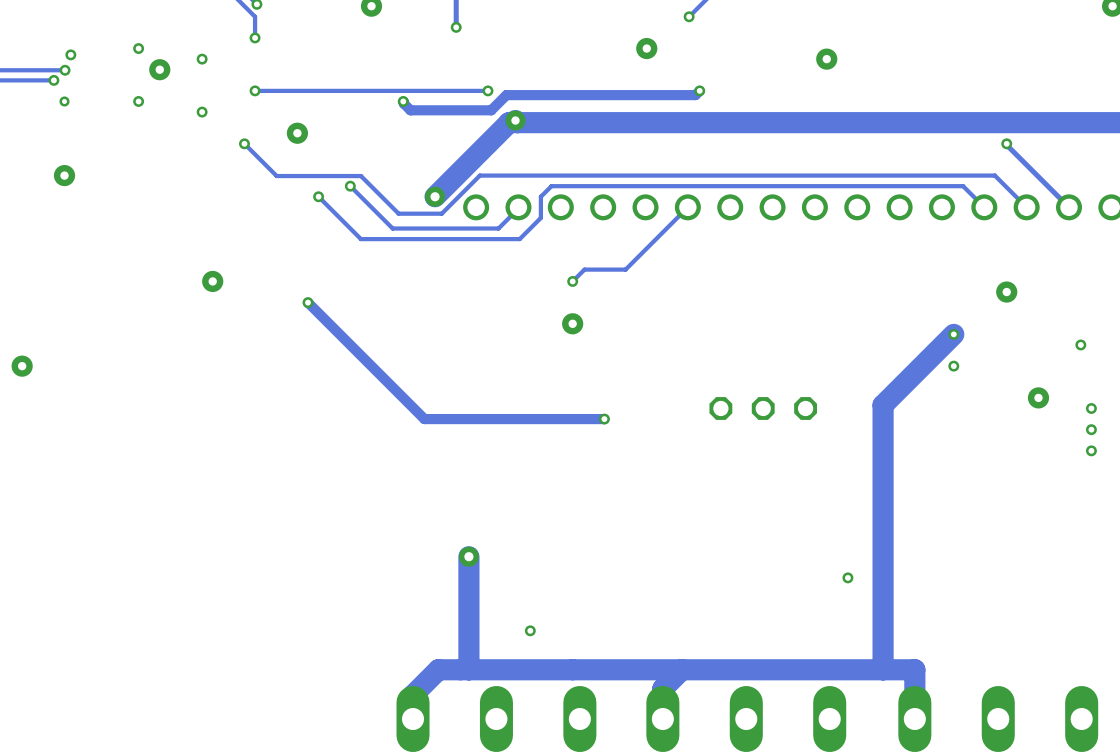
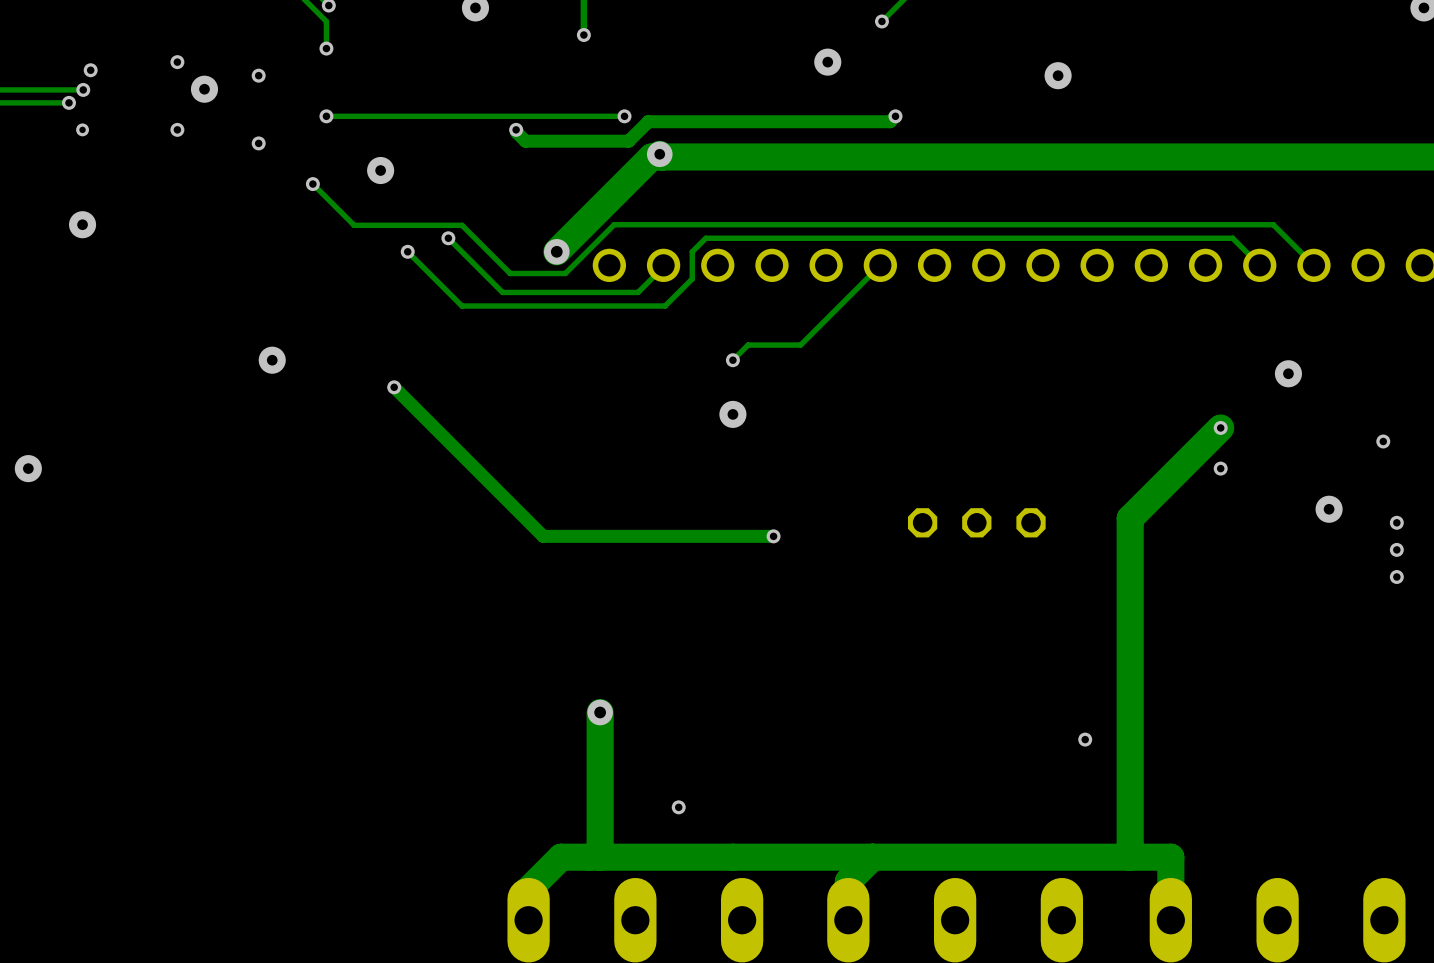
track: (1006, 143) (1069, 207) -> none
via: (1006, 143) -> none

